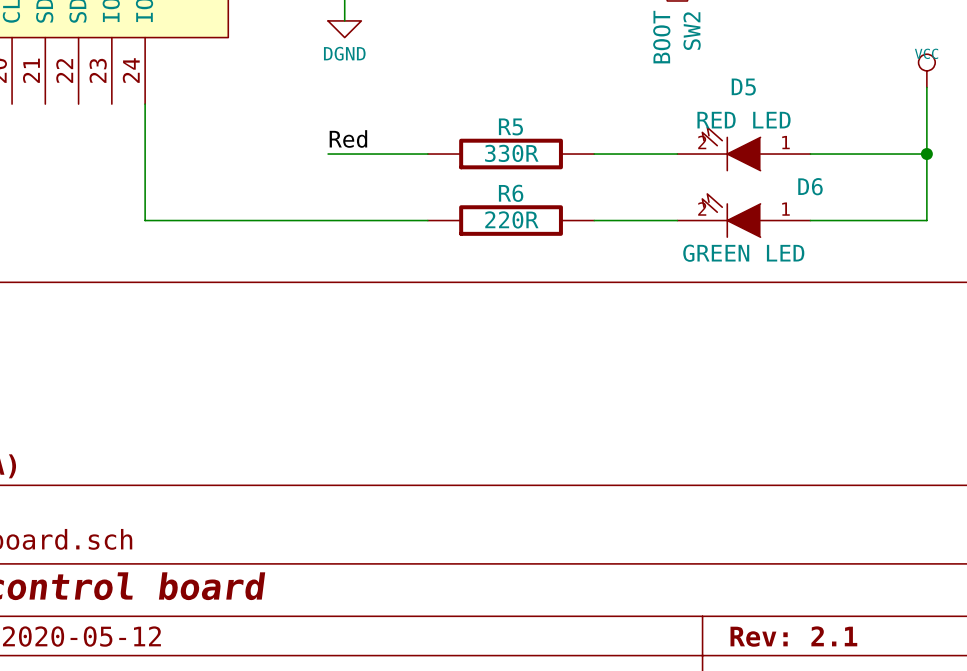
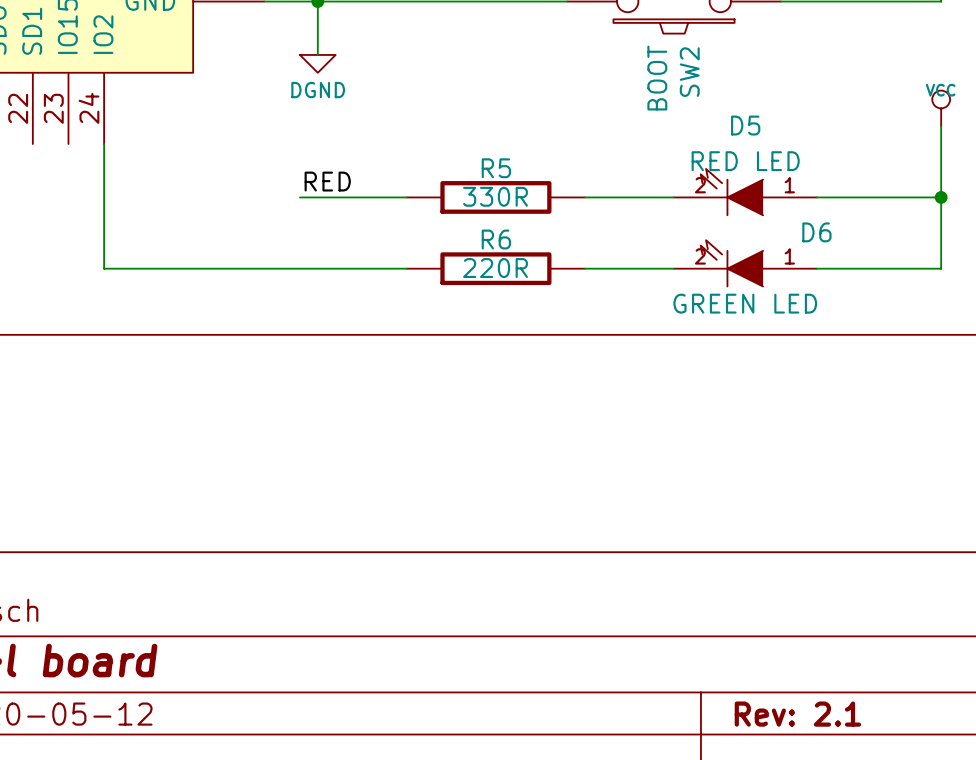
label: Red (348, 138) -> RED (327, 181)

